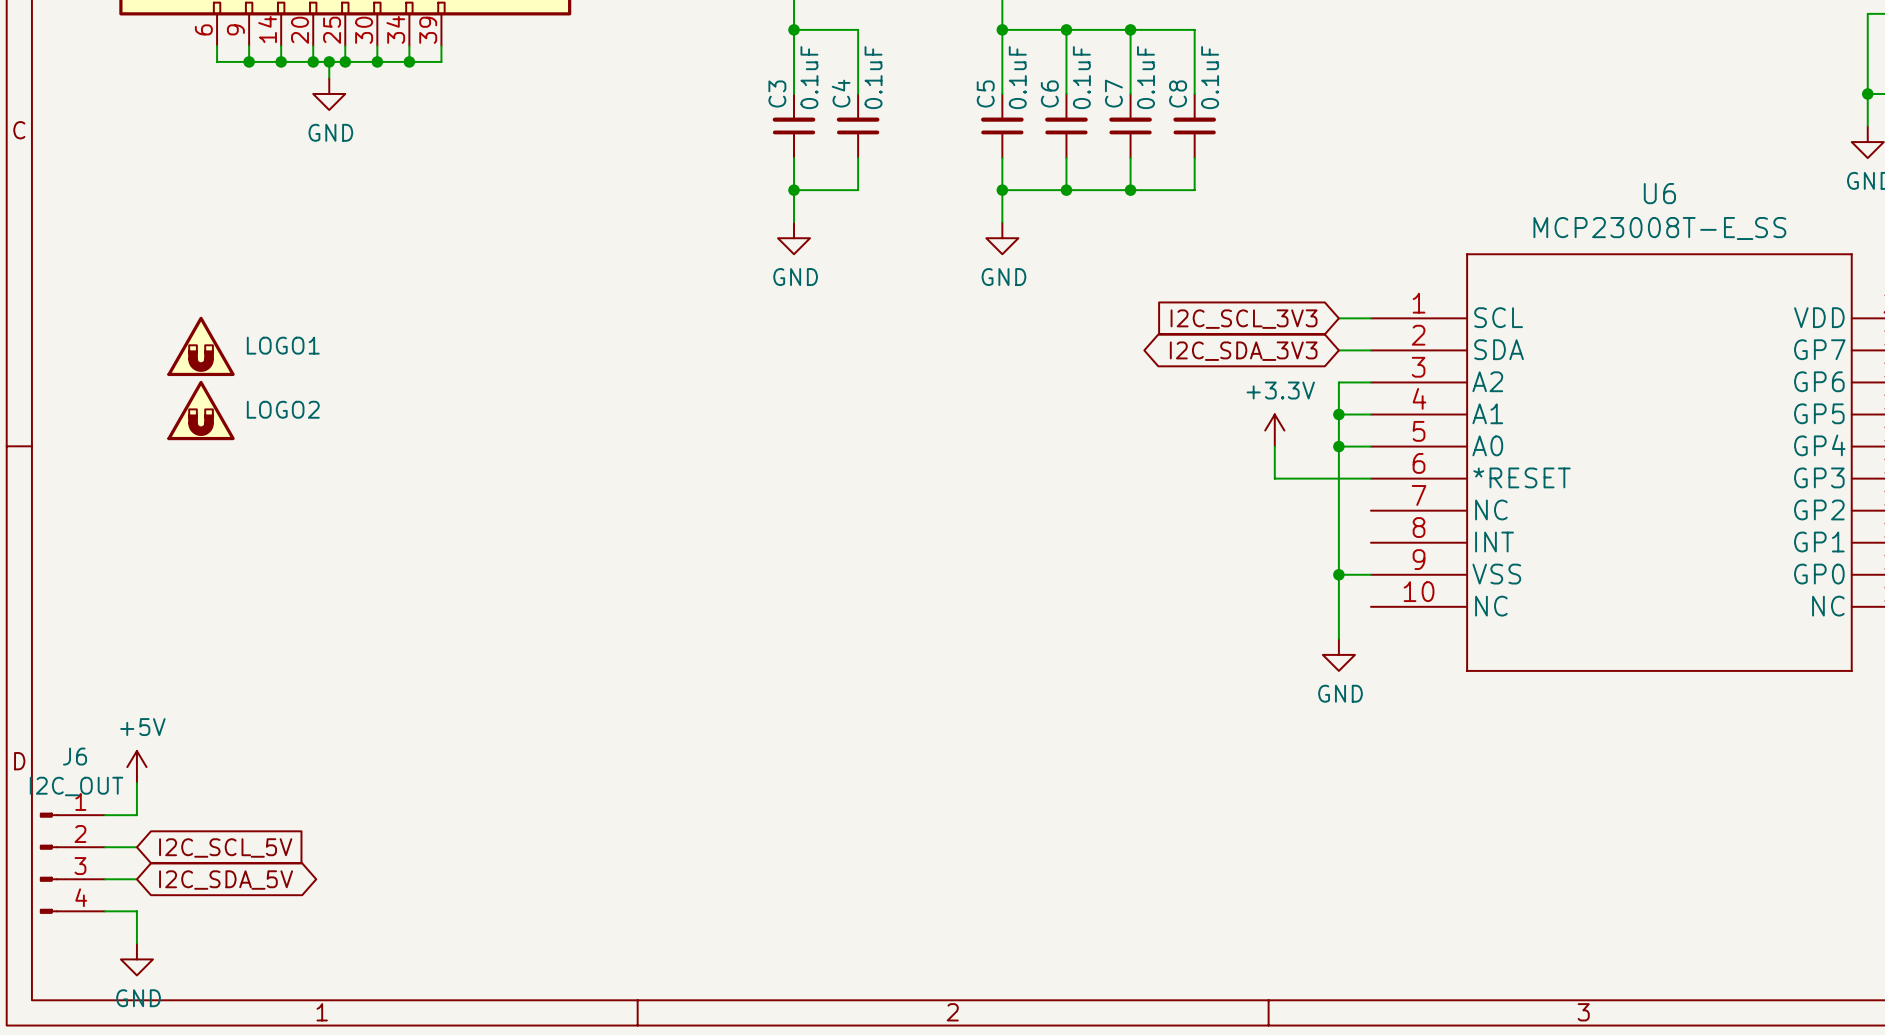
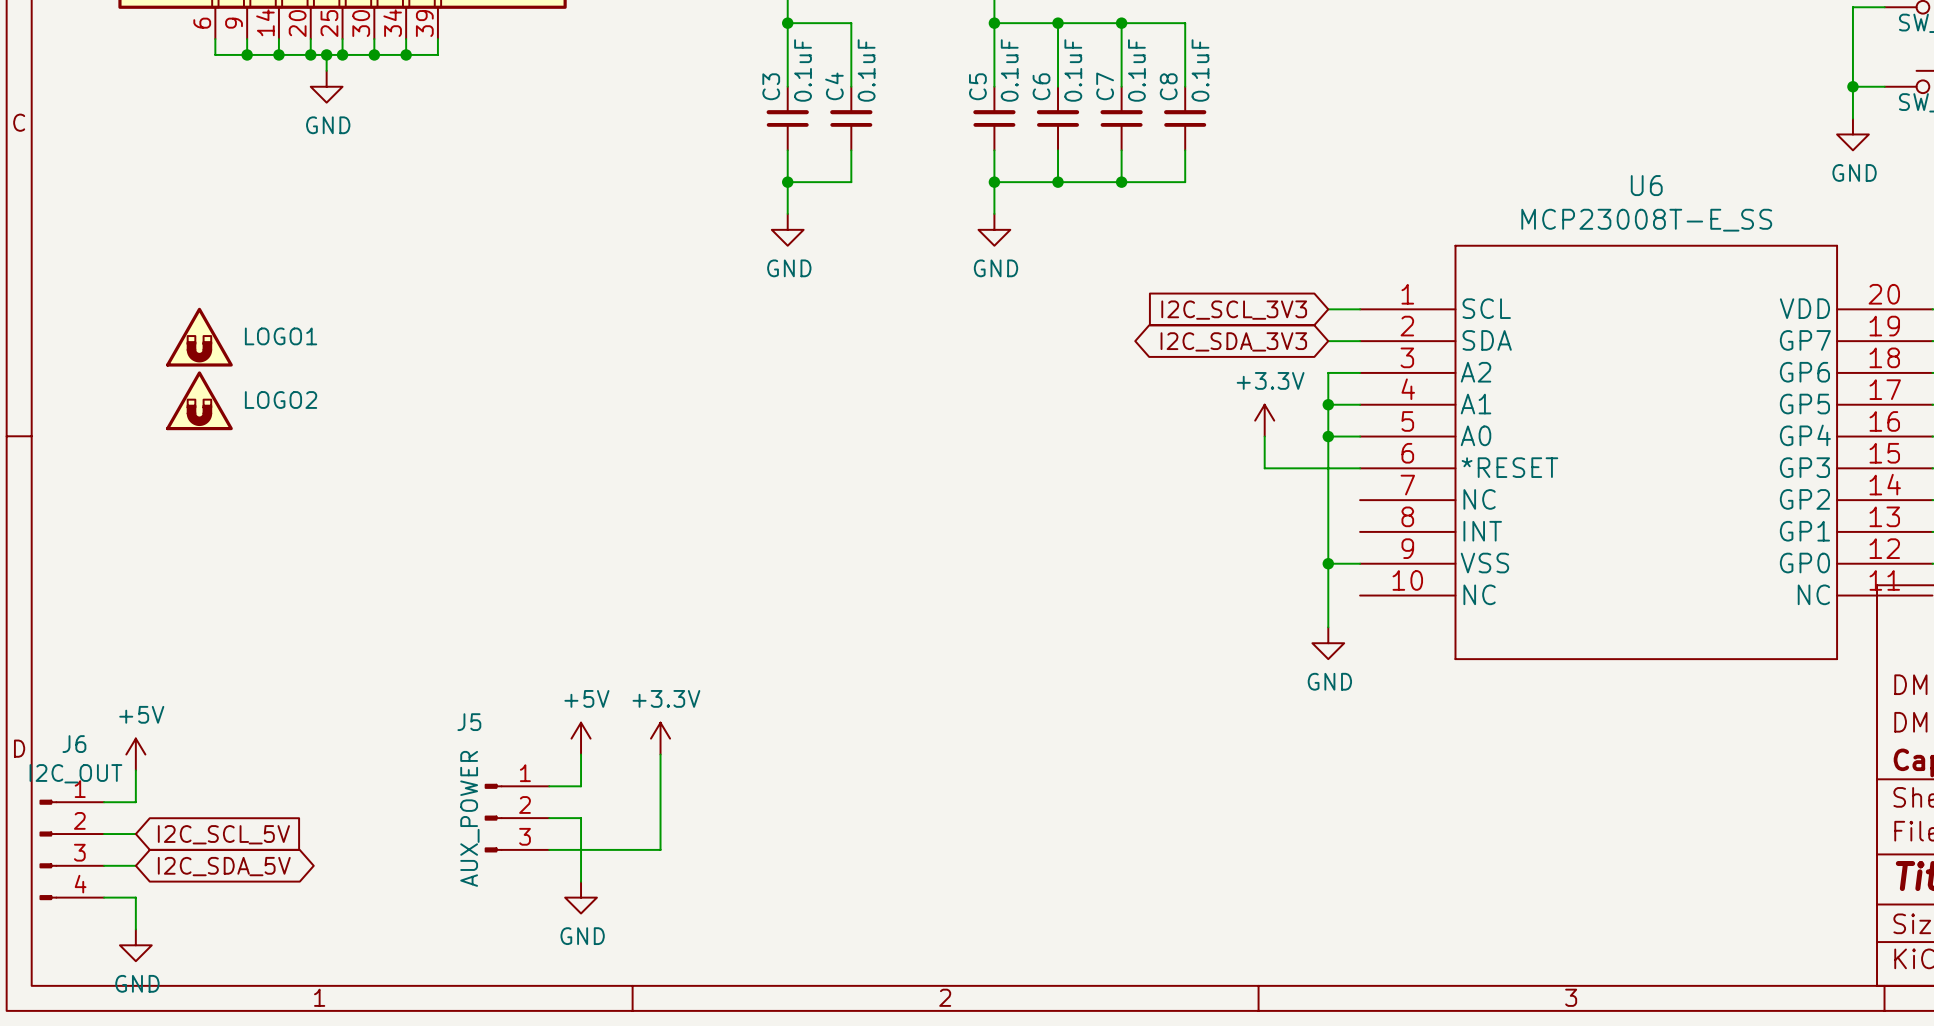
power symbol: none -> +5V (581, 738)
power symbol: none -> +3.3V (660, 738)
wire: none -> (581, 754) (581, 786) (549, 786)
wire: none -> (660, 754) (660, 849) (549, 849)
J5: none -> AUX_POWER (516, 818)
wire: none -> (549, 818) (581, 818) (581, 881)
power symbol: none -> GND (581, 897)

